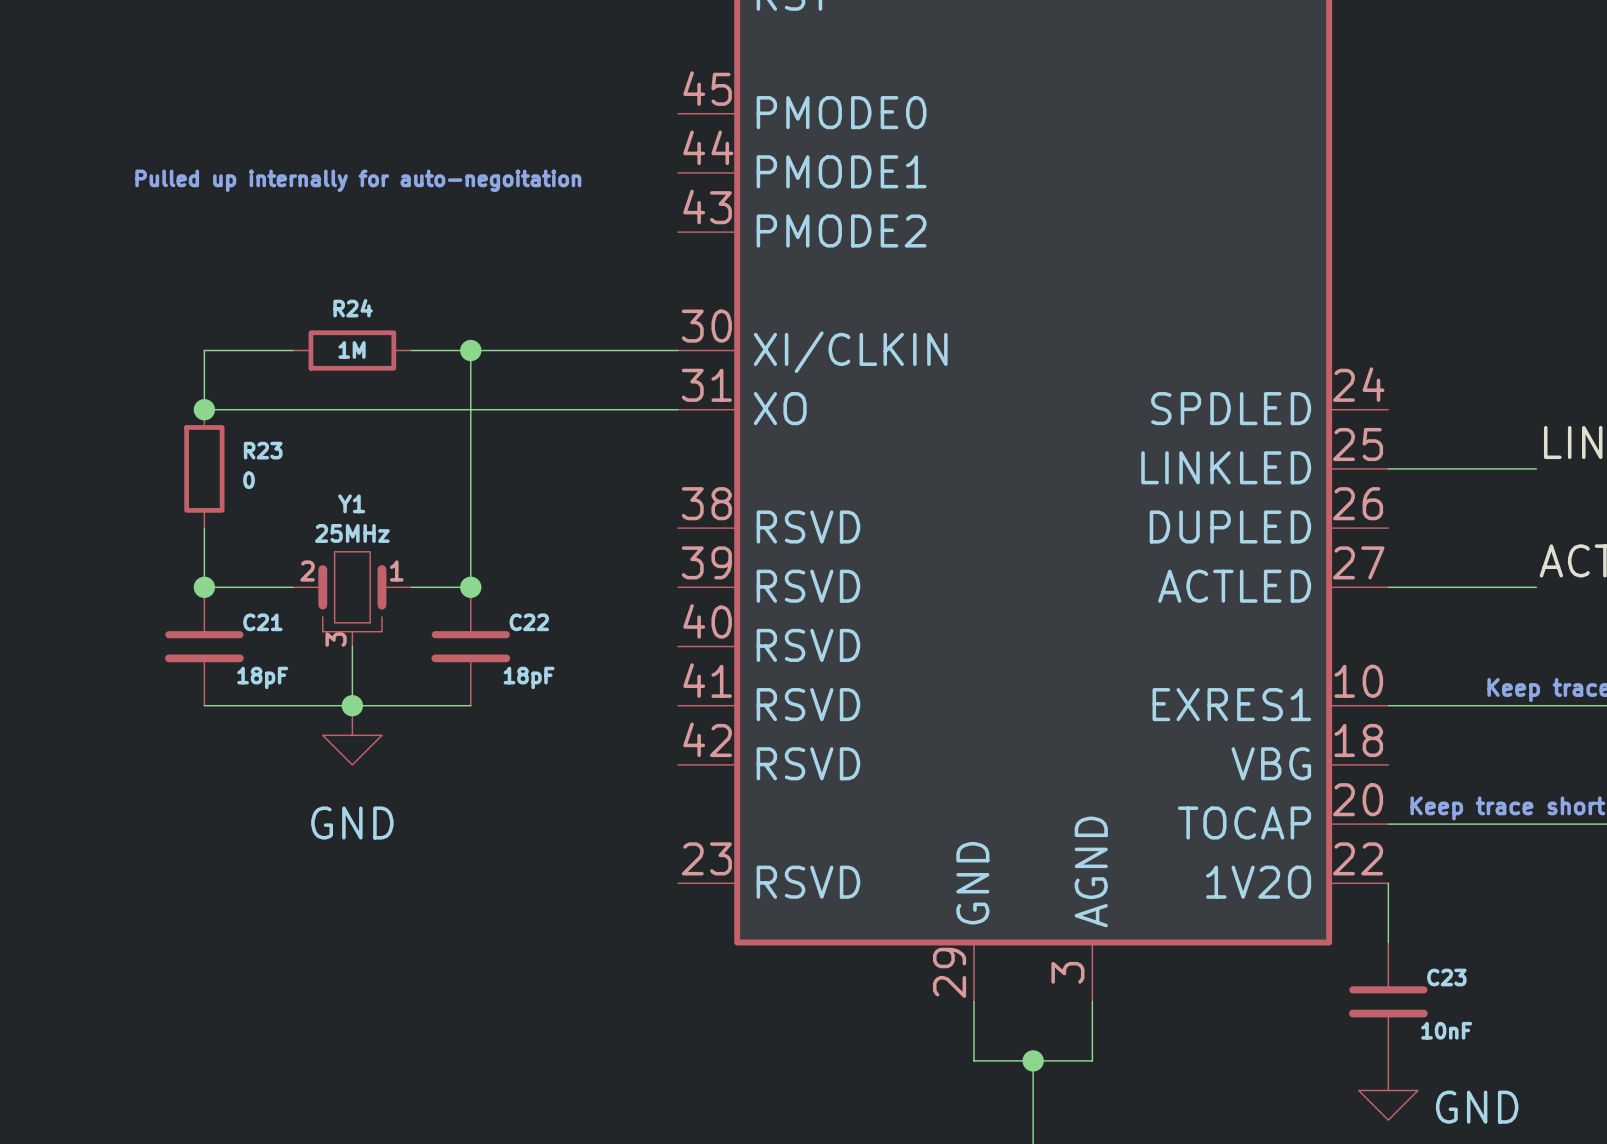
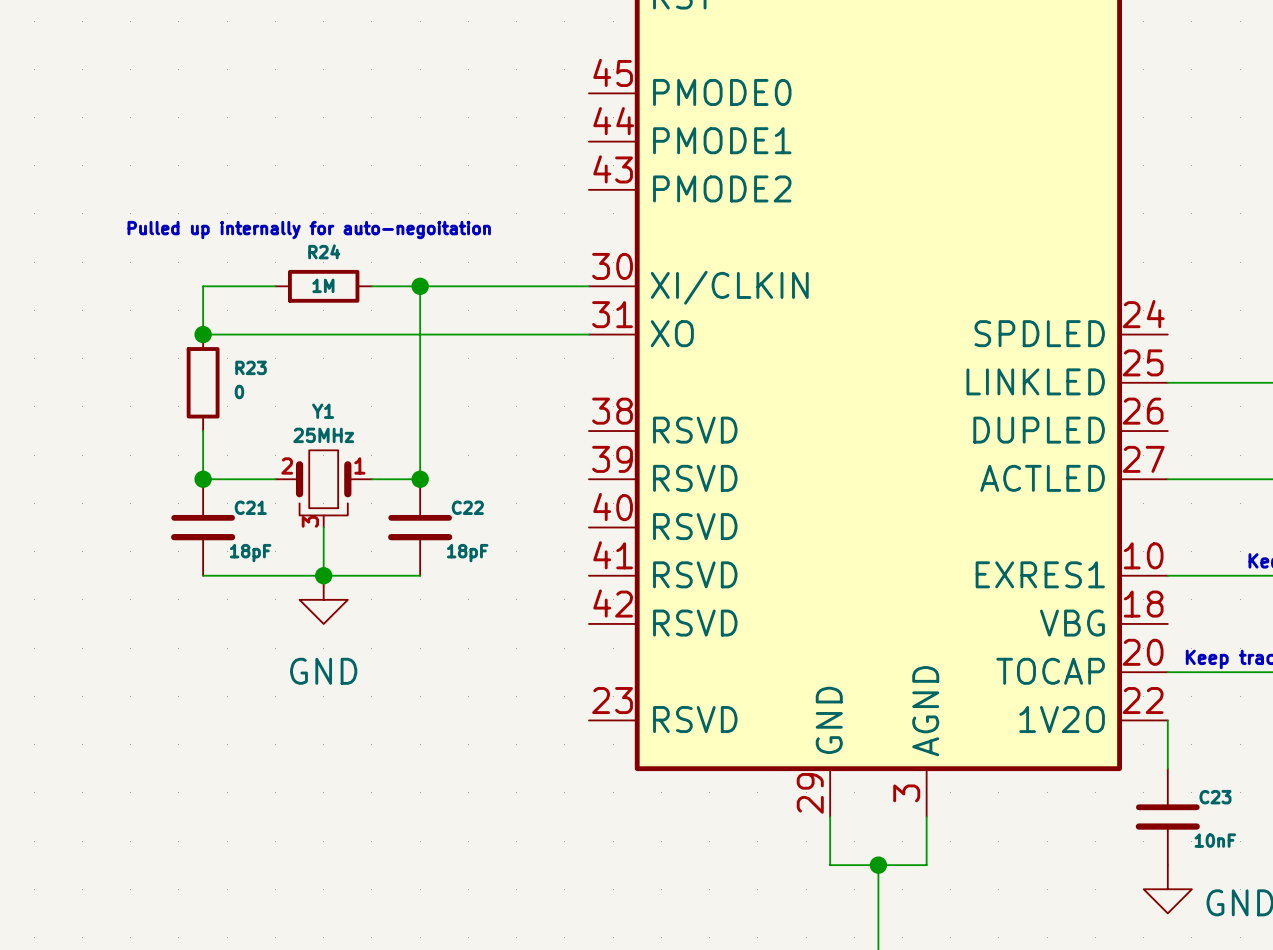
text position: Pulled up internally for auto-negoitation (358, 180) -> Pulled up internally for auto-negoitation (309, 230)

